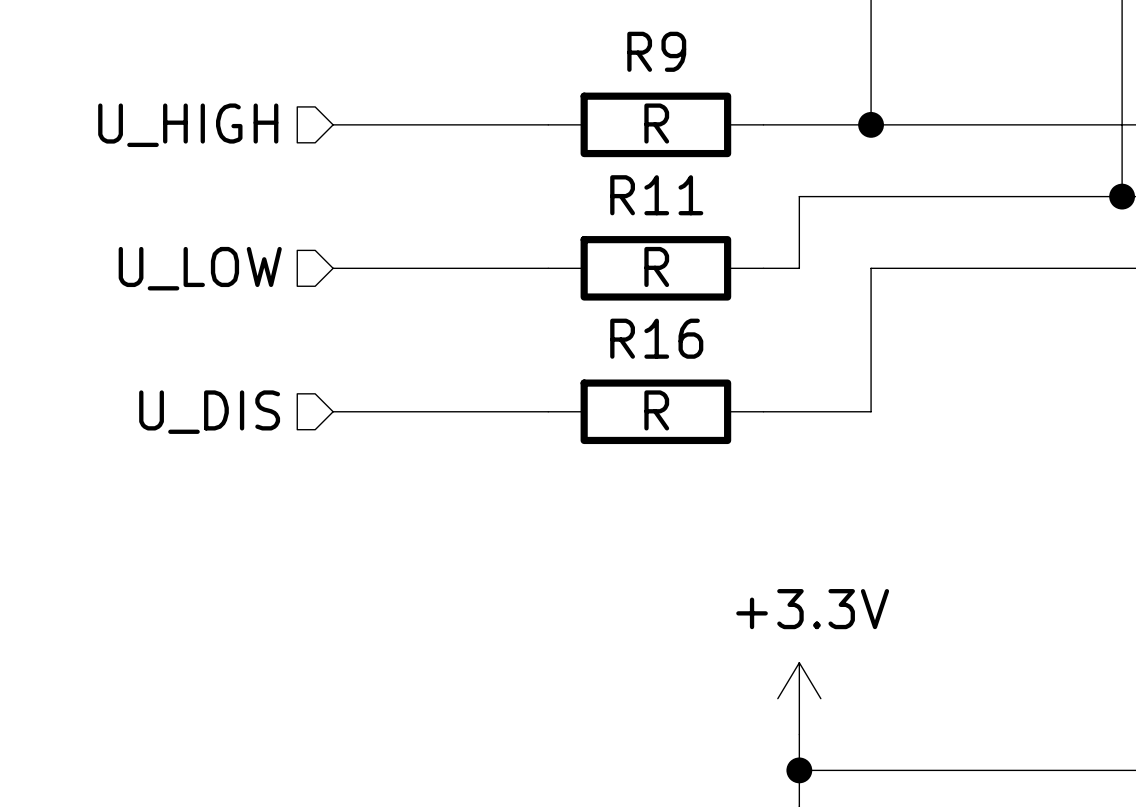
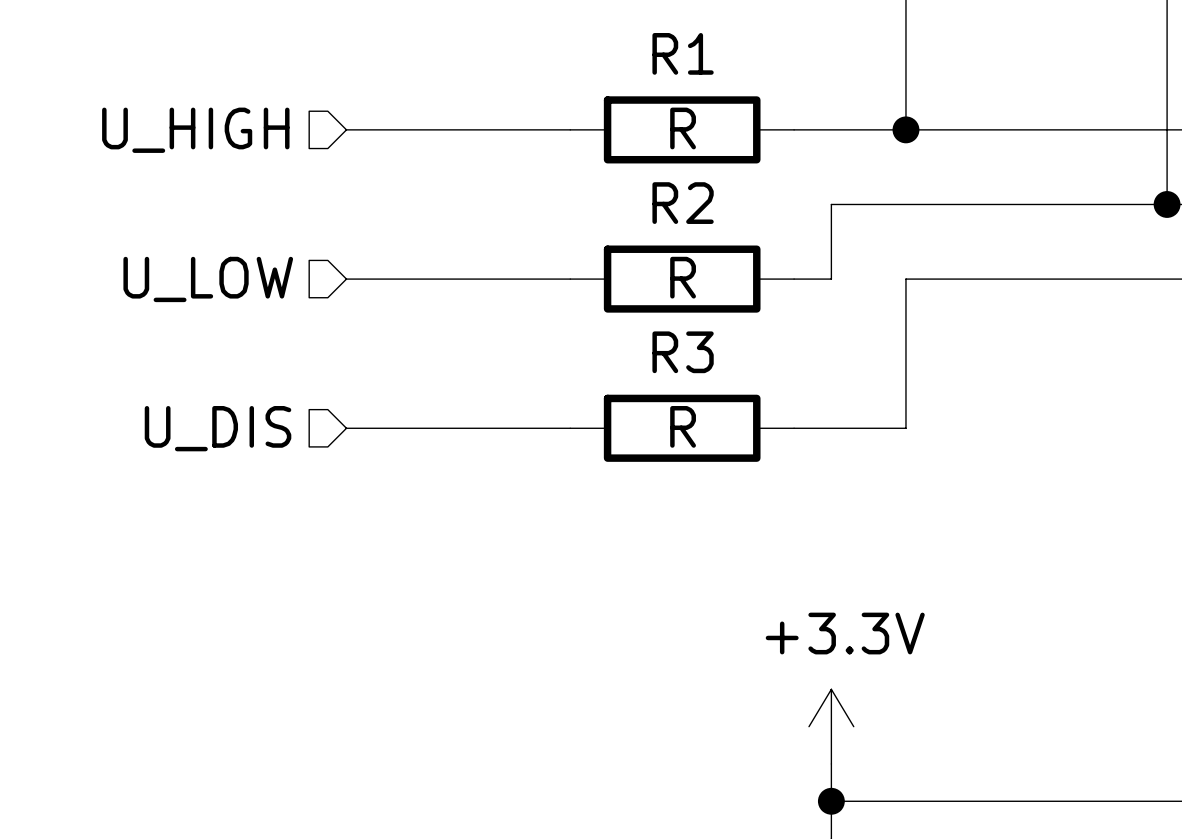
R9 name: R9 (656, 51) -> R1 (683, 53)
R11 name: R11 (656, 195) -> R2 (683, 203)
R16 name: R16 (656, 338) -> R3 (683, 352)

